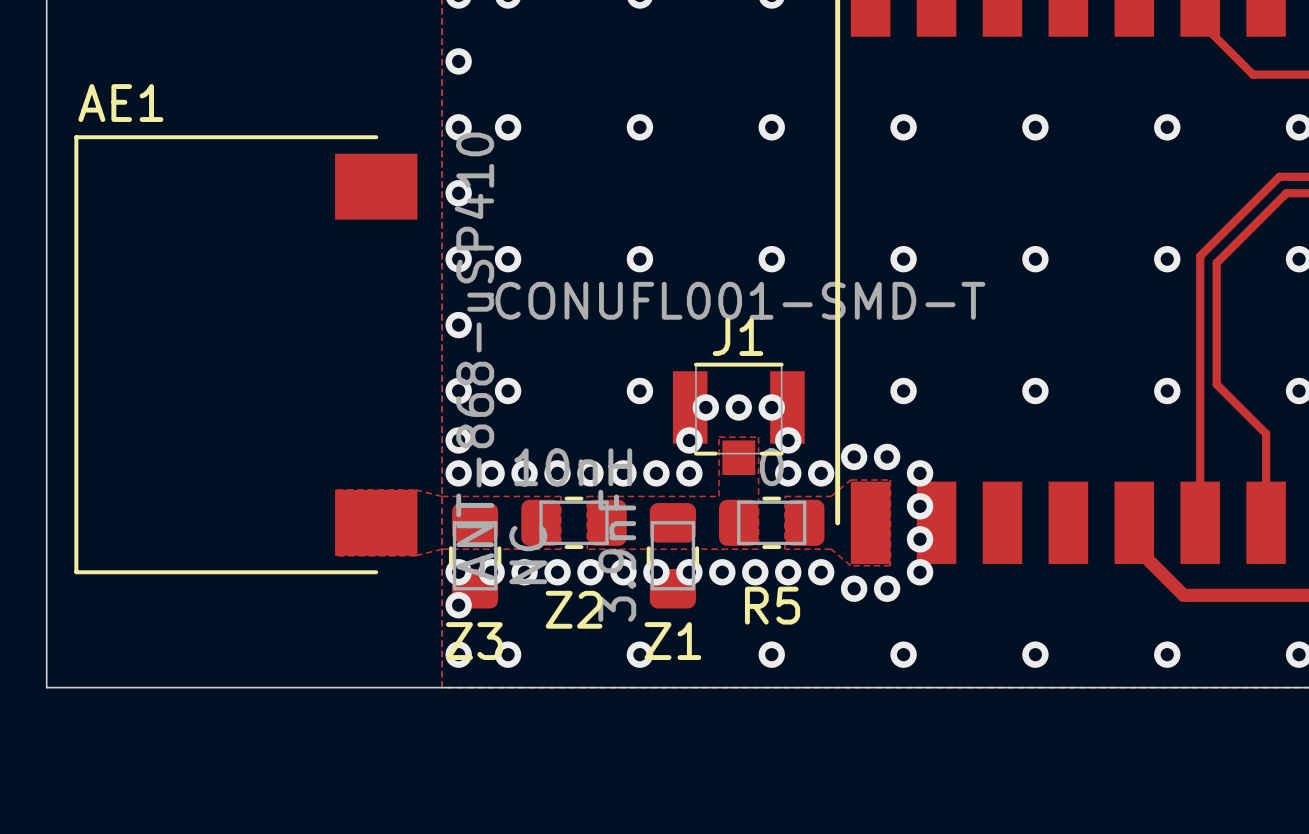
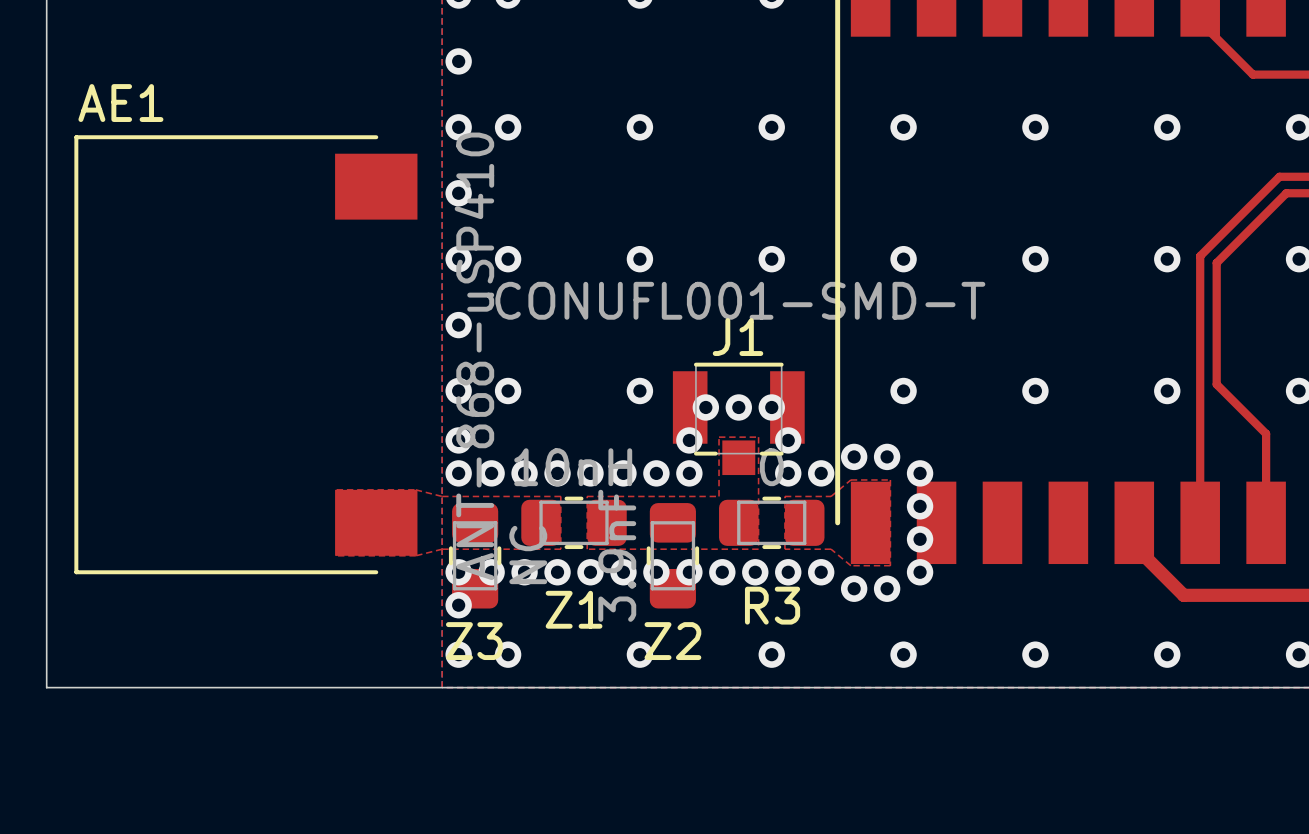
R5 name: R5 (772, 605) -> R3 (772, 605)
Z2 name: Z2 (574, 609) -> Z1 (574, 609)
Z1 name: Z1 (672, 641) -> Z2 (672, 641)

